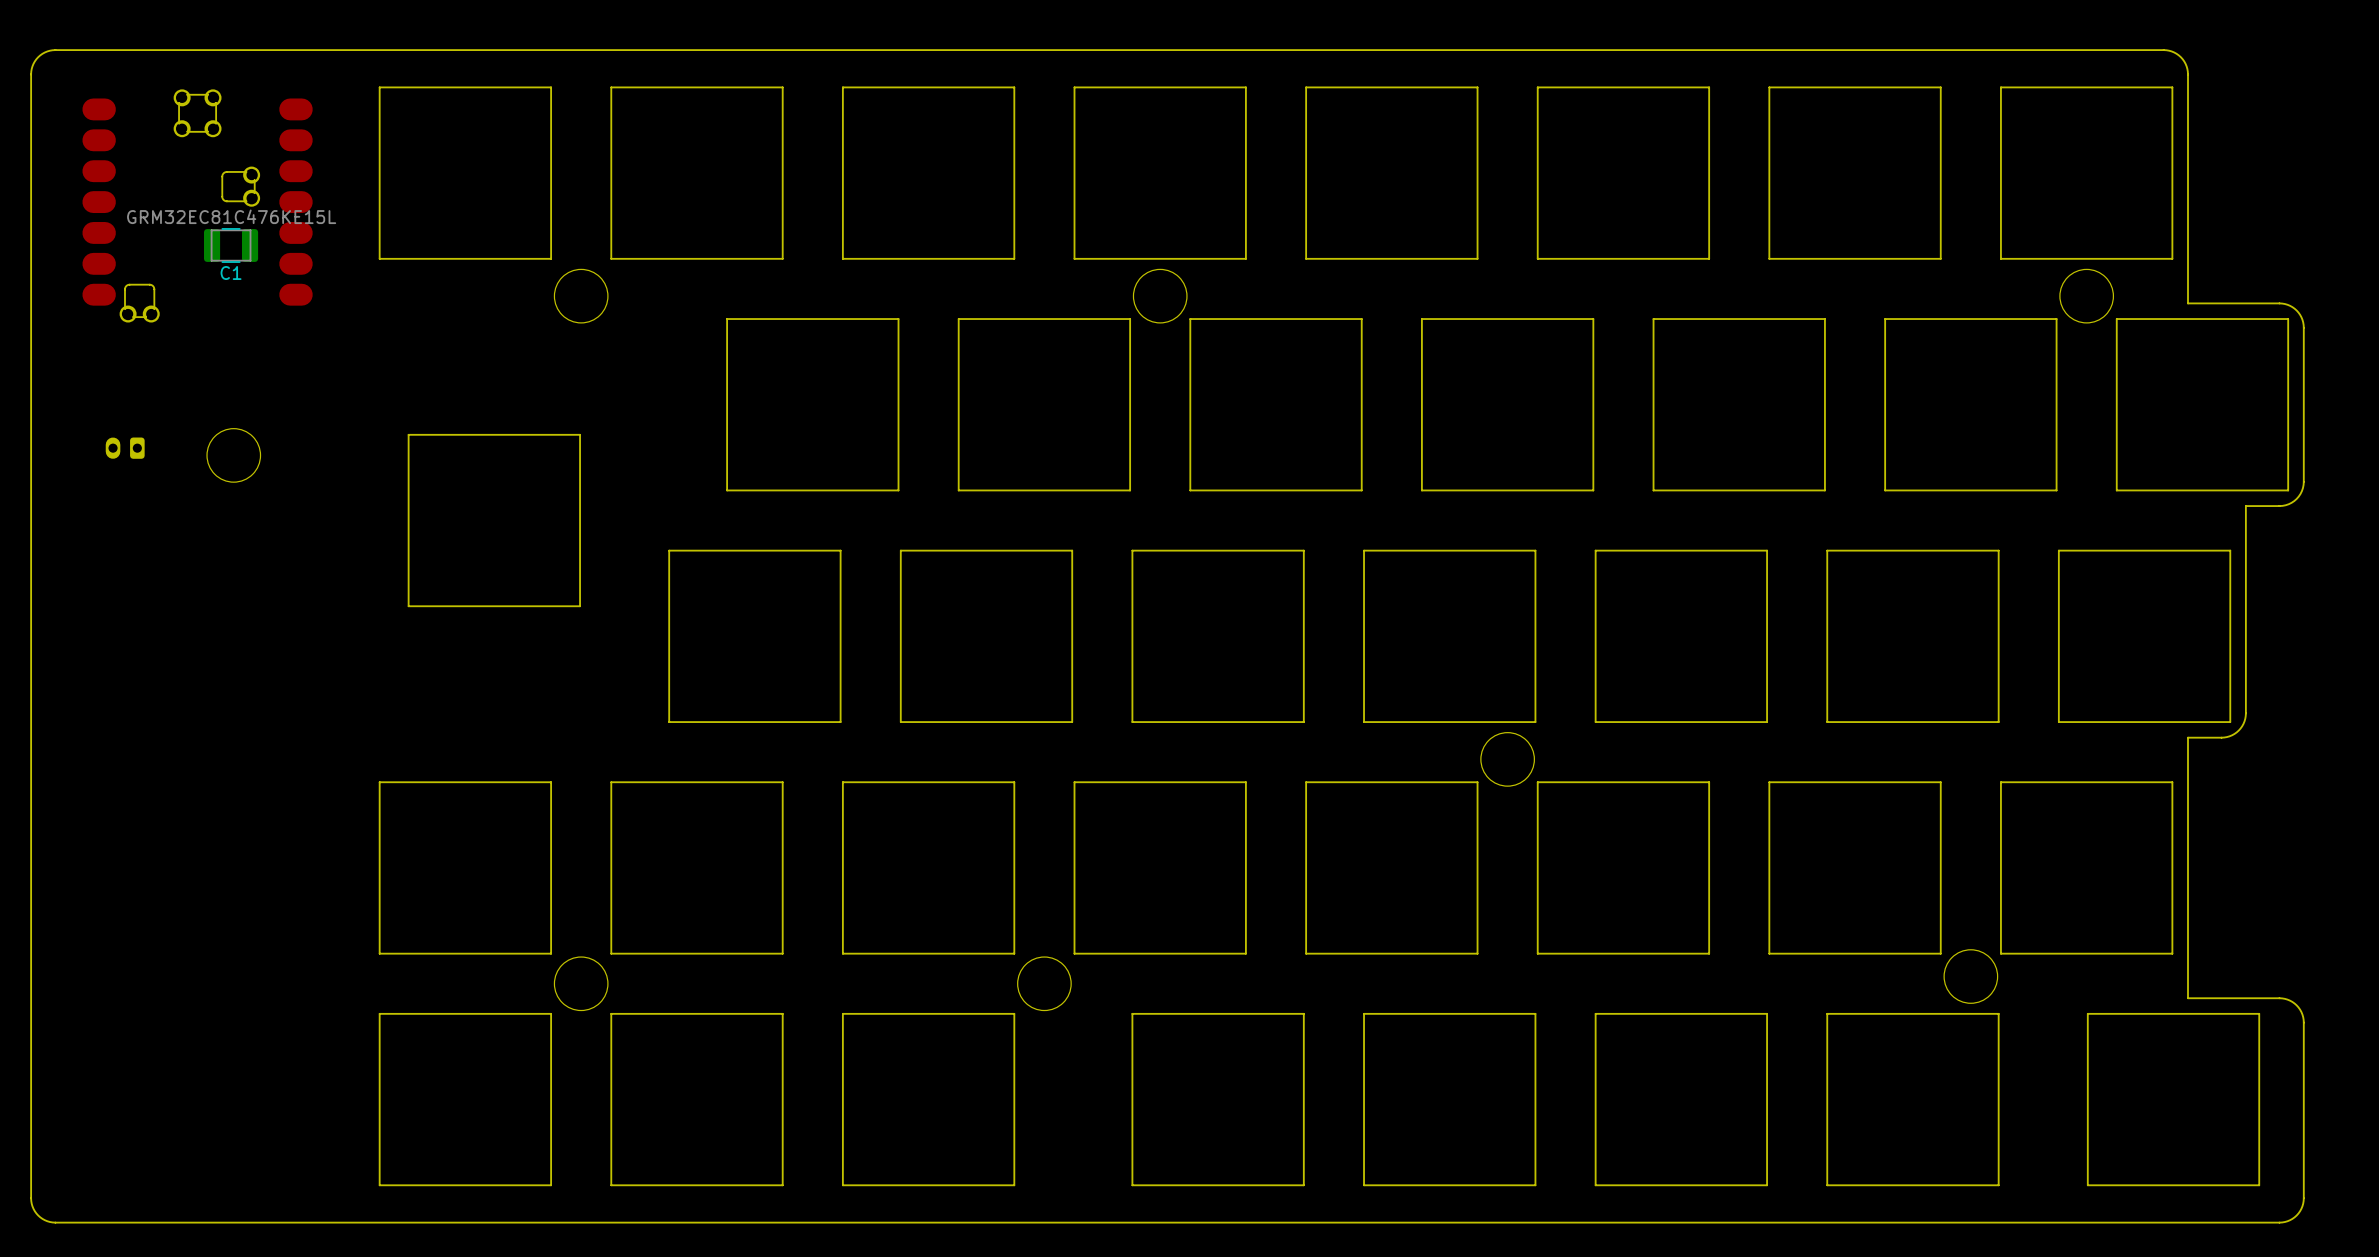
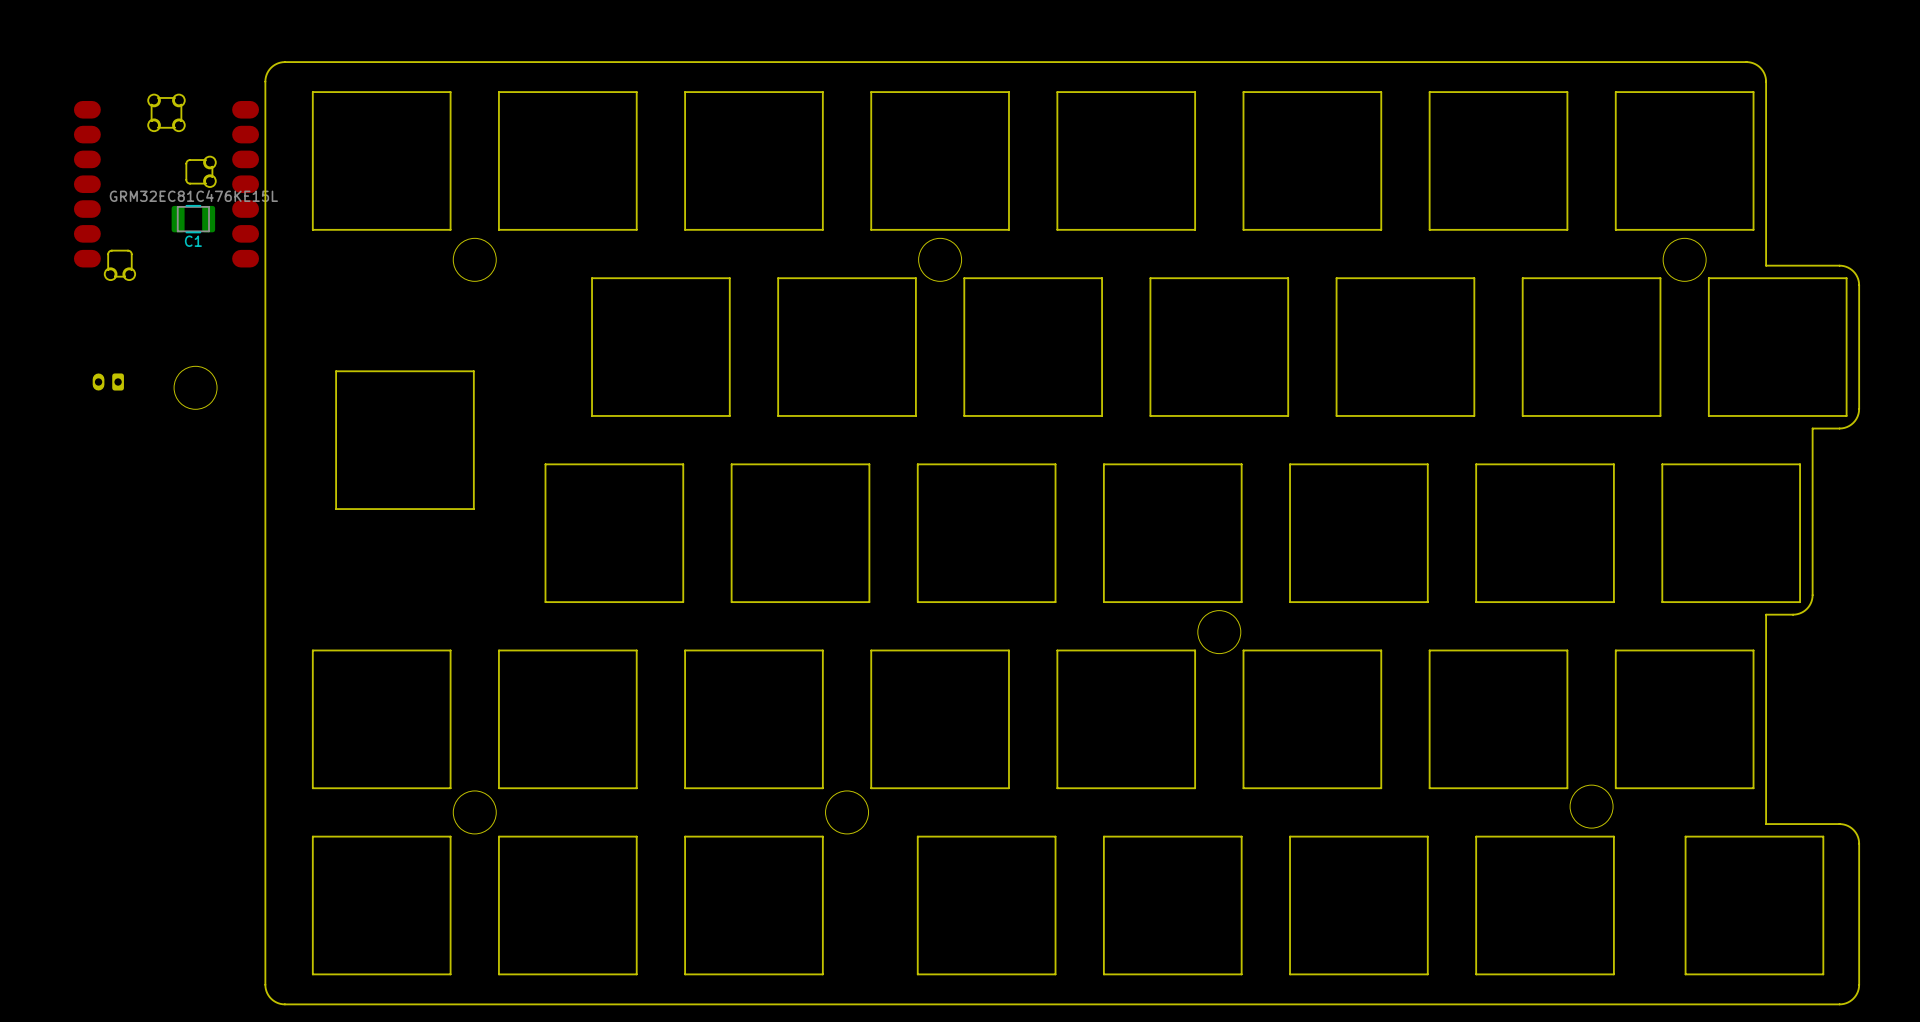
board edge: (344, 50) (52, 50) (44, 52) (36, 59) (31, 74) (31, 1203) (40, 1217) (52, 1222) (344, 1222) -> (284, 62) (271, 67) (265, 81) (265, 984) (271, 998) (284, 1004)

